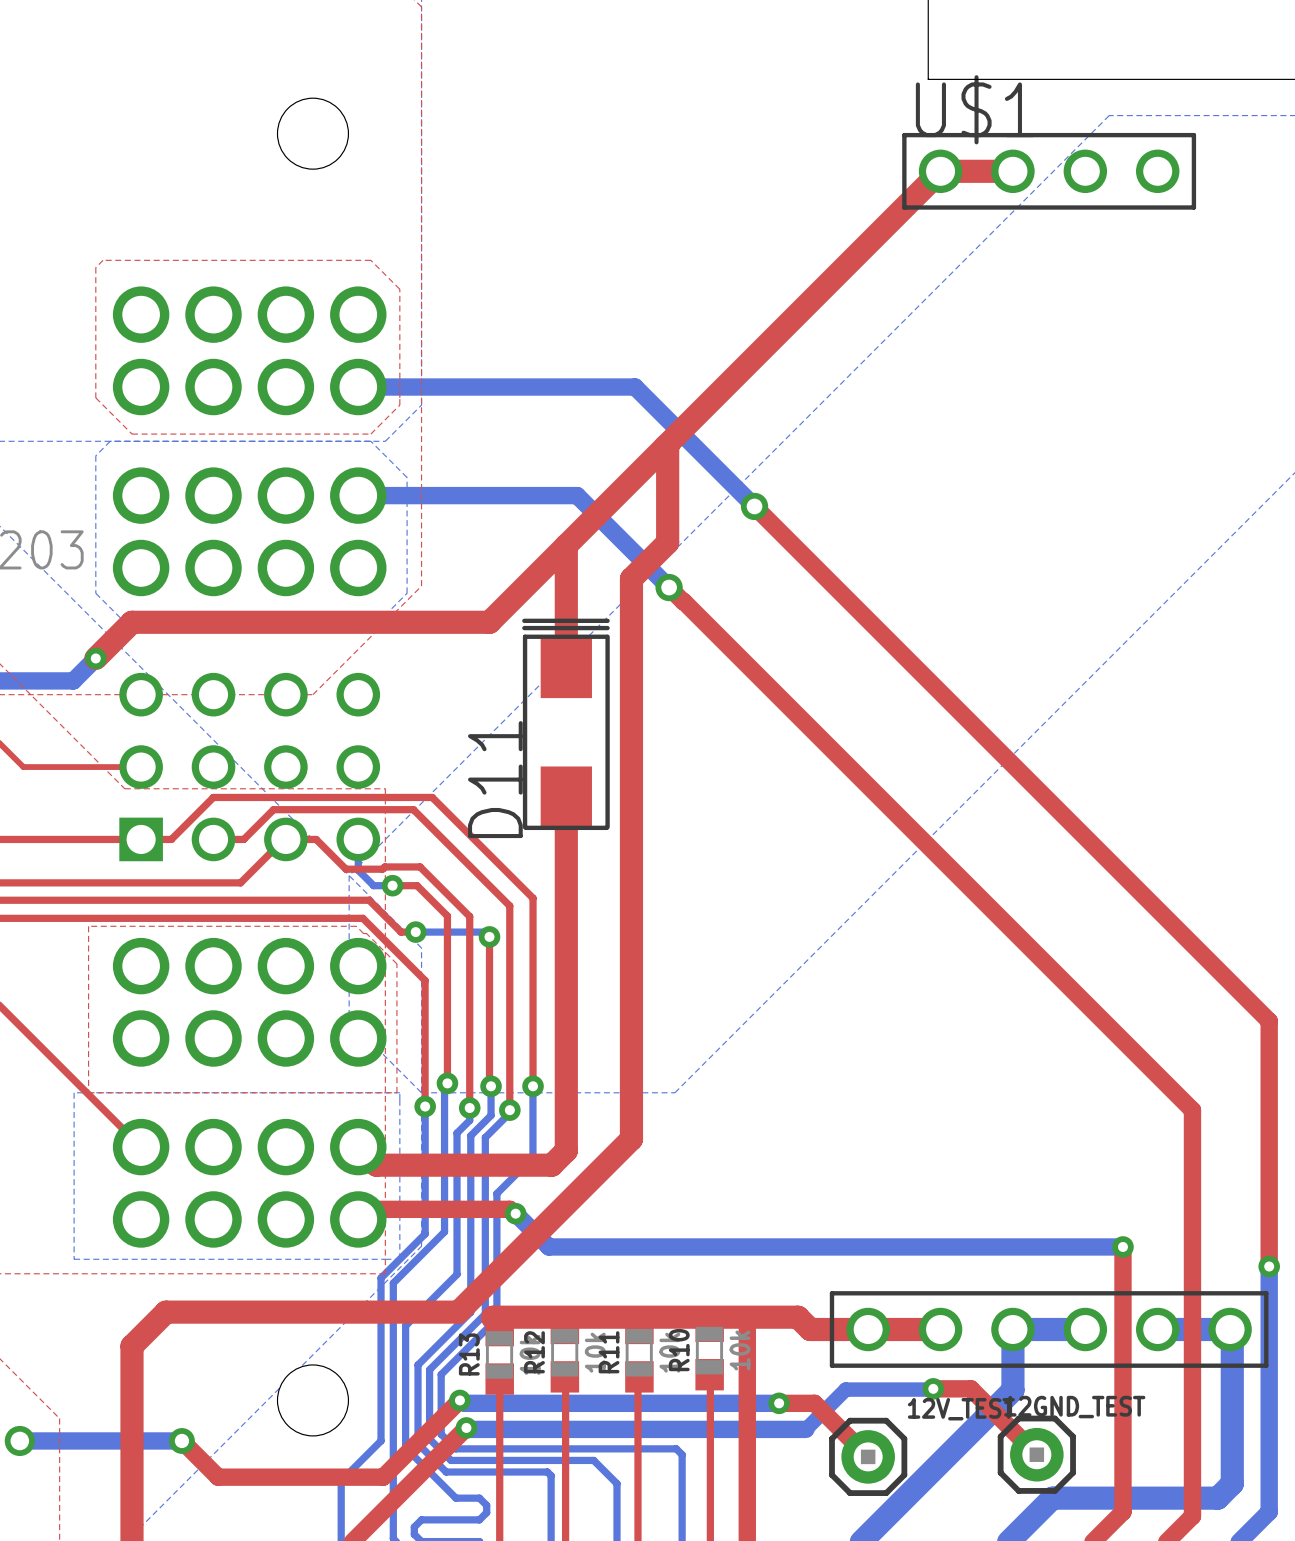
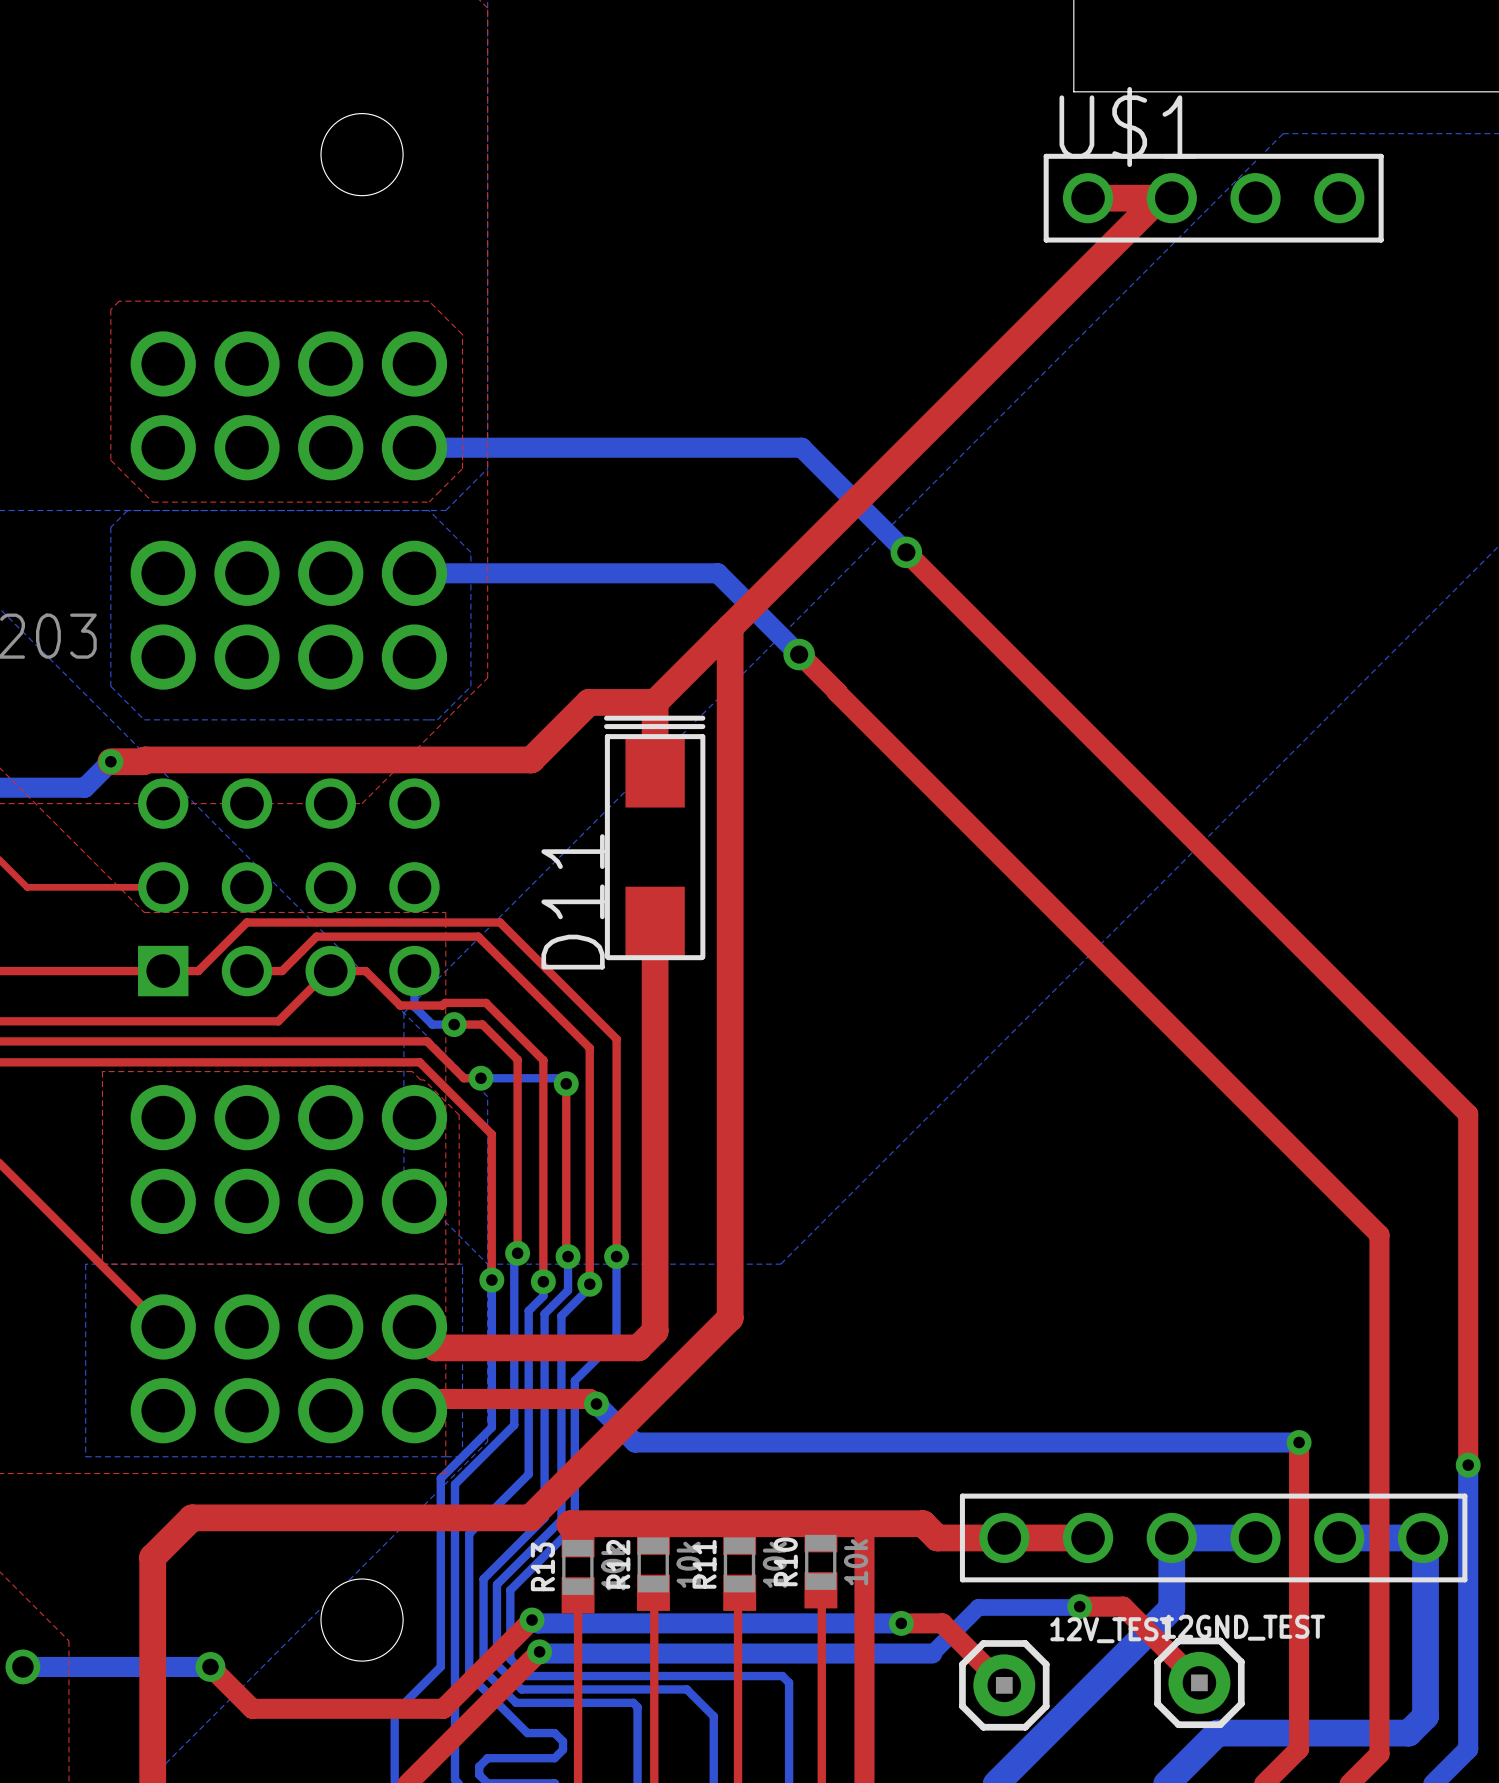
top track: (940, 171) (489, 622) (132, 622) (95, 658) -> (1159, 198) (655, 702) (588, 702) (531, 759) (145, 759) (143, 761) (110, 761)
bottom track: (635, 387) (754, 506) -> (734, 447) (801, 447) (906, 552)
top track: (665, 446) (667, 448) (667, 542) (631, 578) (631, 1139) -> (721, 635) (730, 627) (730, 1318)
bottom track: (577, 495) (669, 587) -> (667, 573) (717, 573) (799, 654)
top track: (754, 506) (1269, 1021) -> (906, 552) (1468, 1114) (1468, 1181)
via position: (754, 506) -> (906, 552)
top track: (566, 545) (566, 607) -> none
top track: (669, 587) (1192, 1110) -> (799, 654) (1379, 1234) (1379, 1284)
via position: (669, 587) -> (799, 654)

